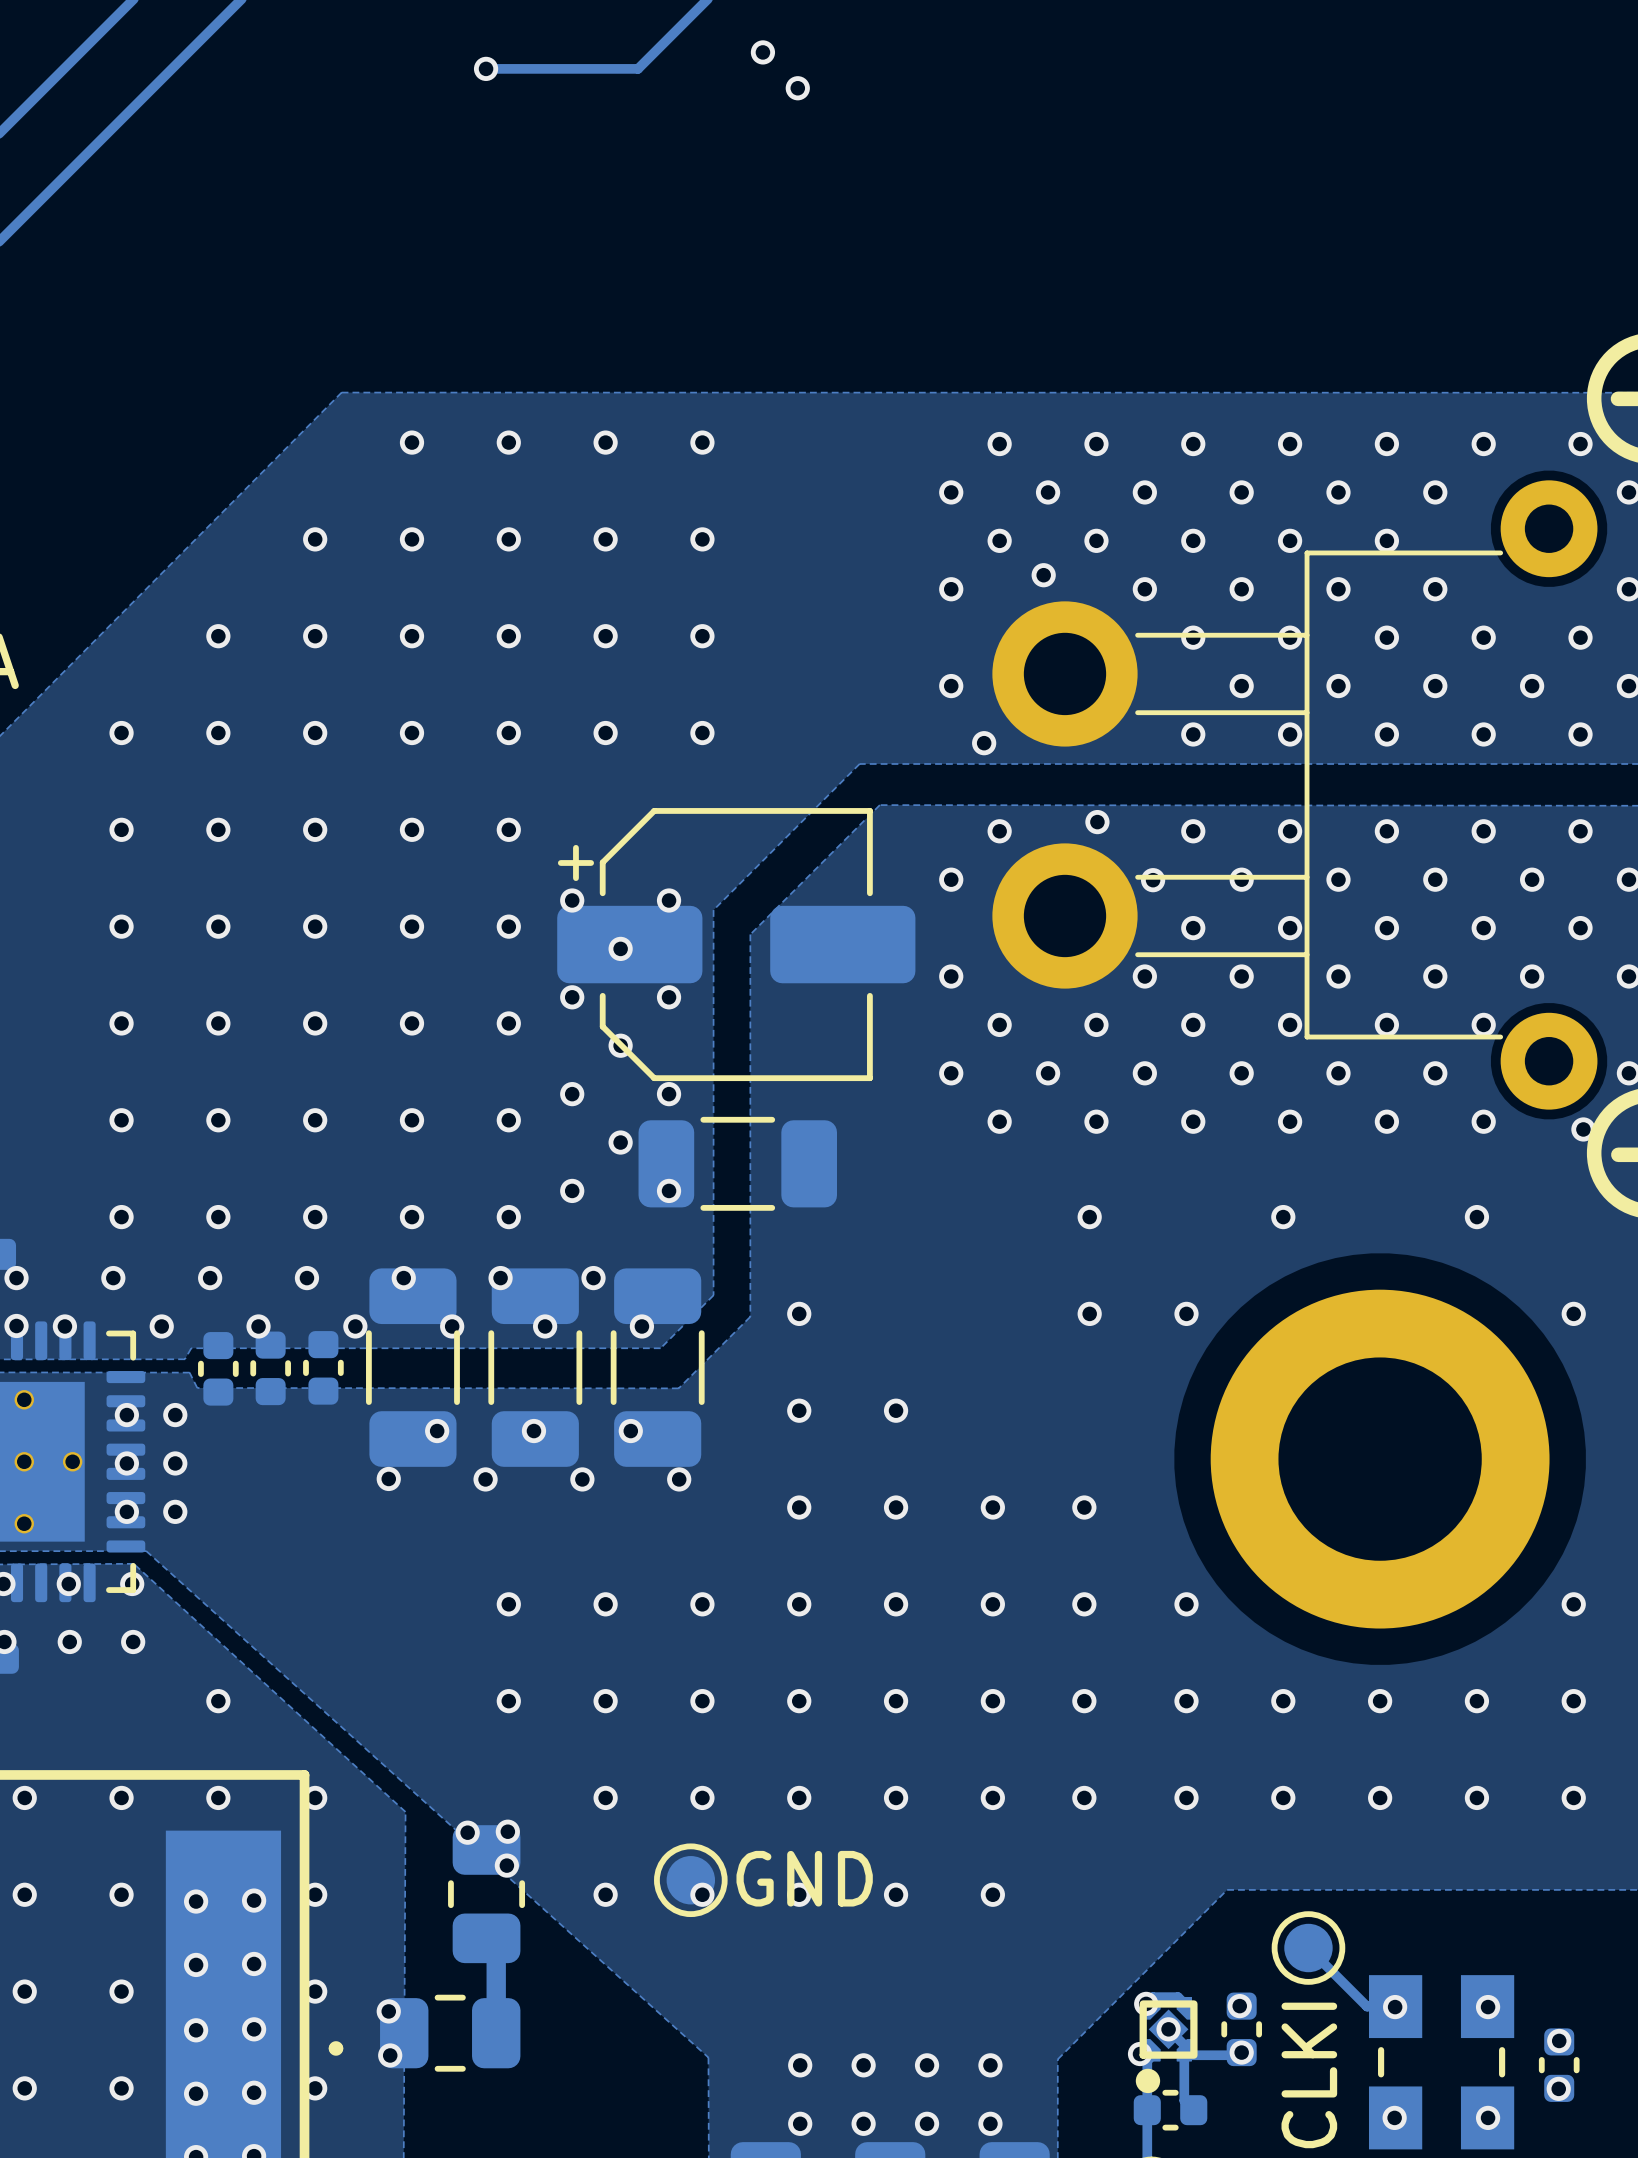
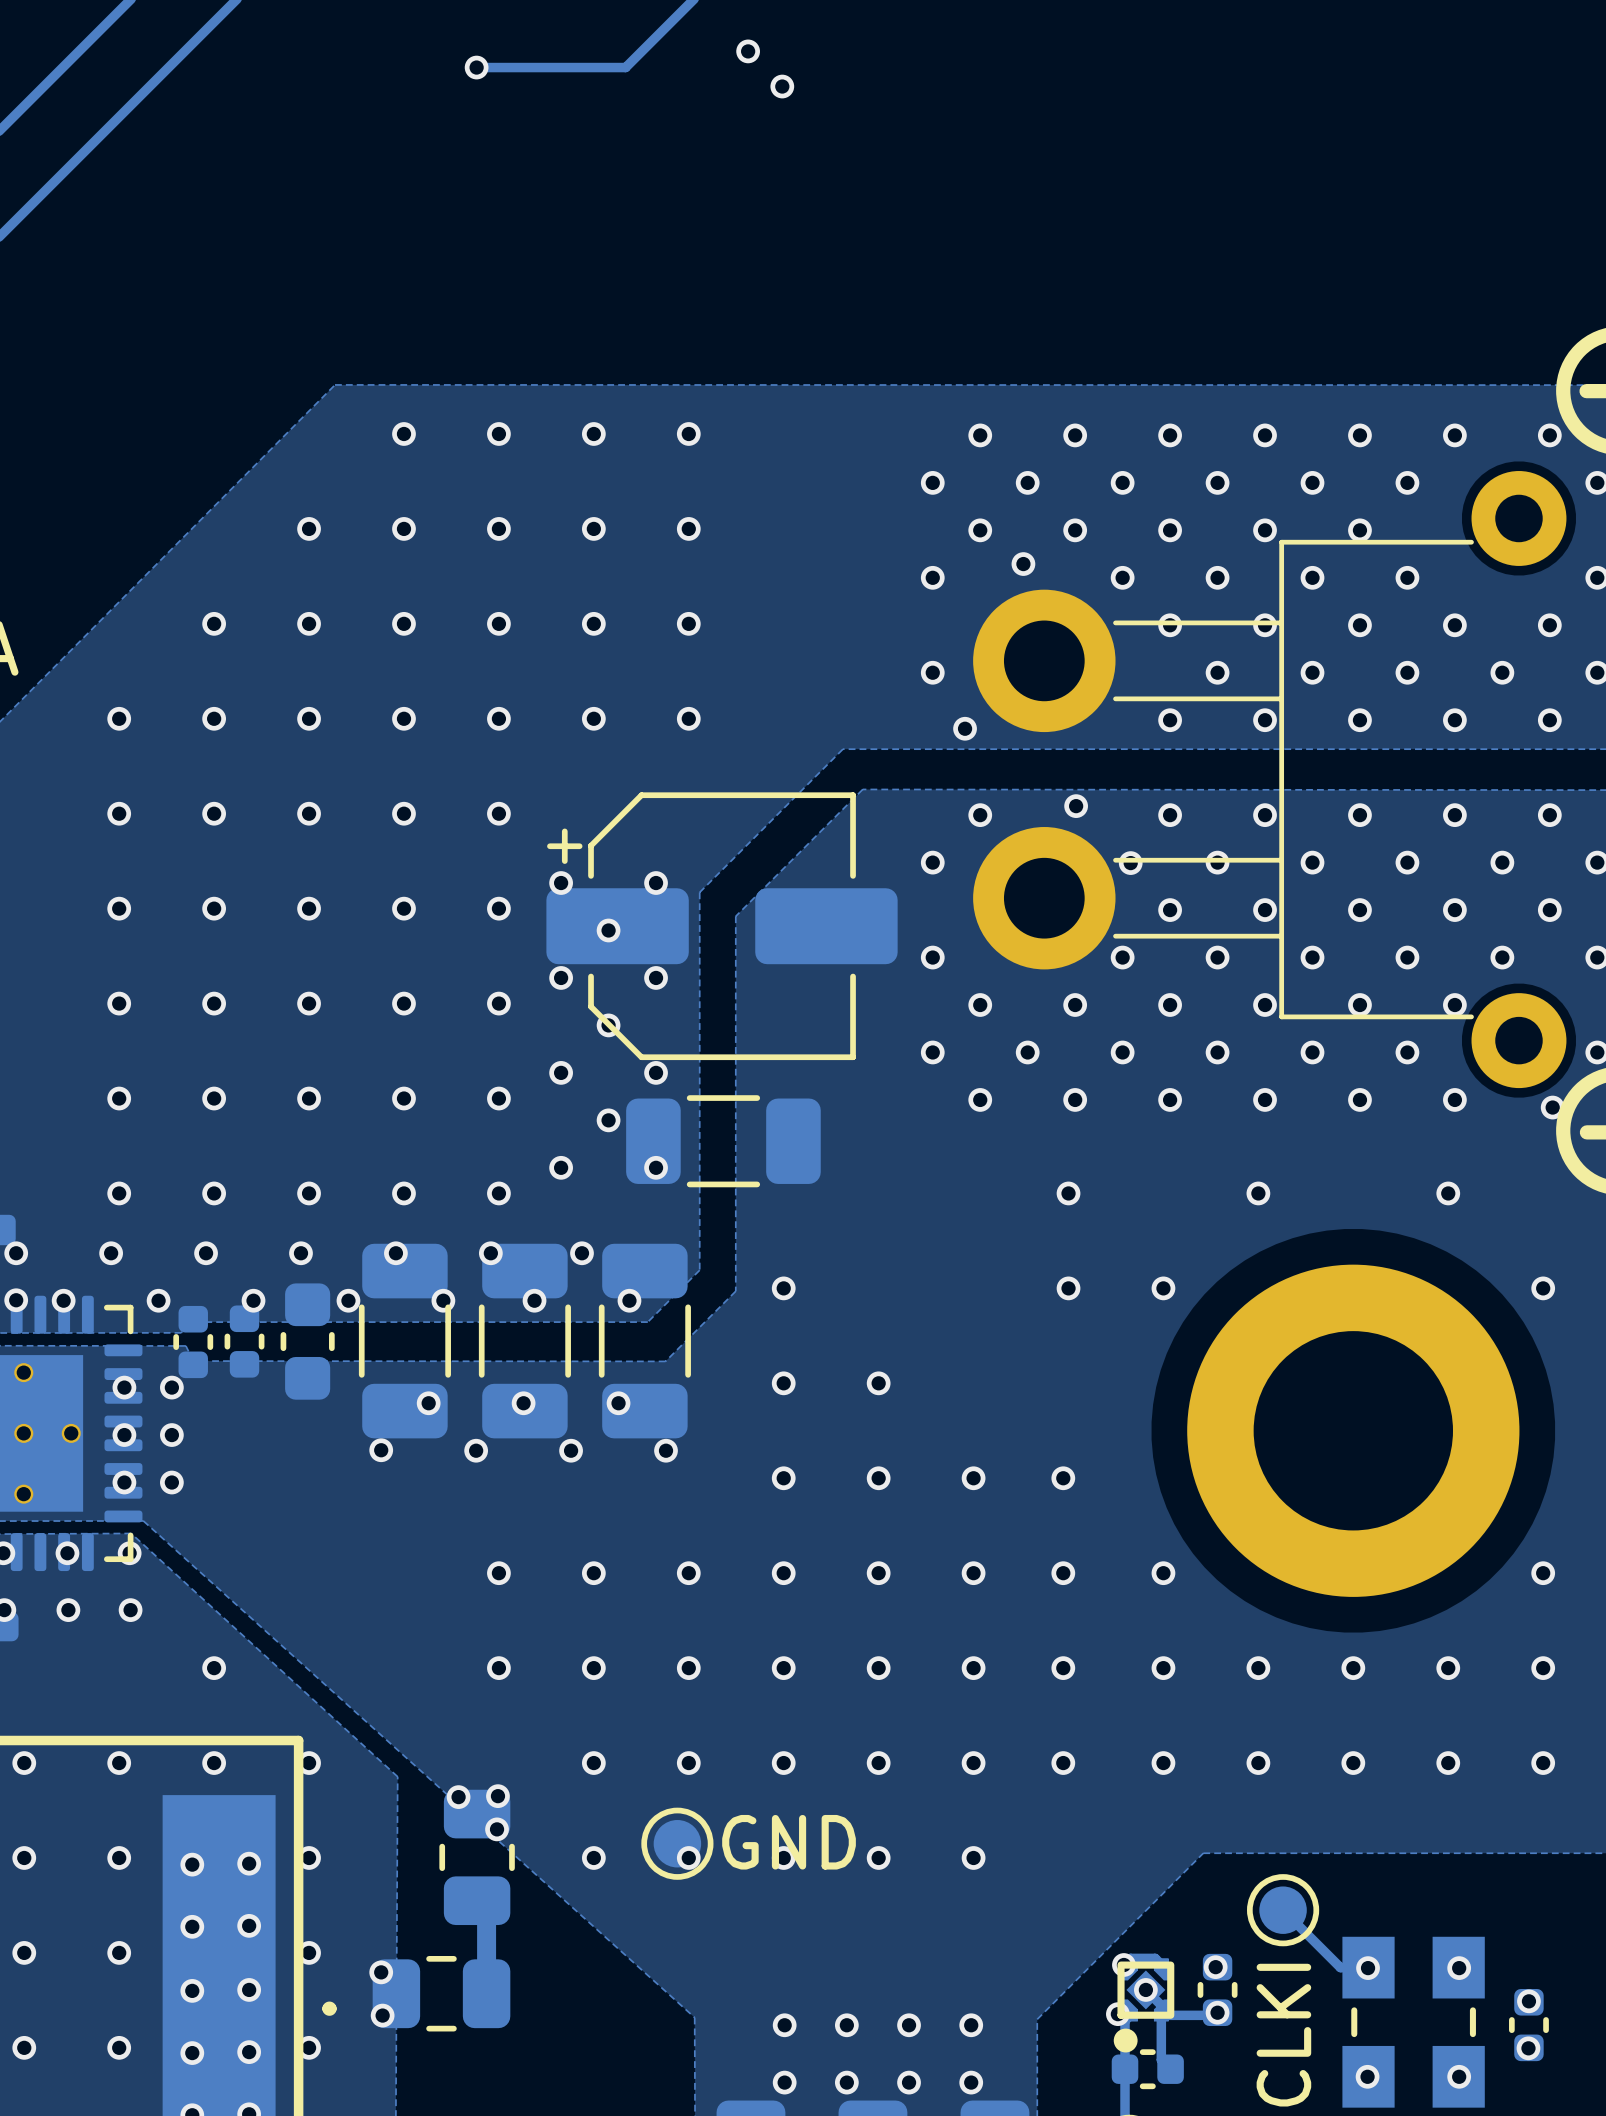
part footprint: [303, 1331, 344, 1405] -> [280, 1283, 335, 1400]
part: none -> (193, 1342)
part: (218, 1368) -> none
part: none -> (244, 1341)
part: (270, 1368) -> none

